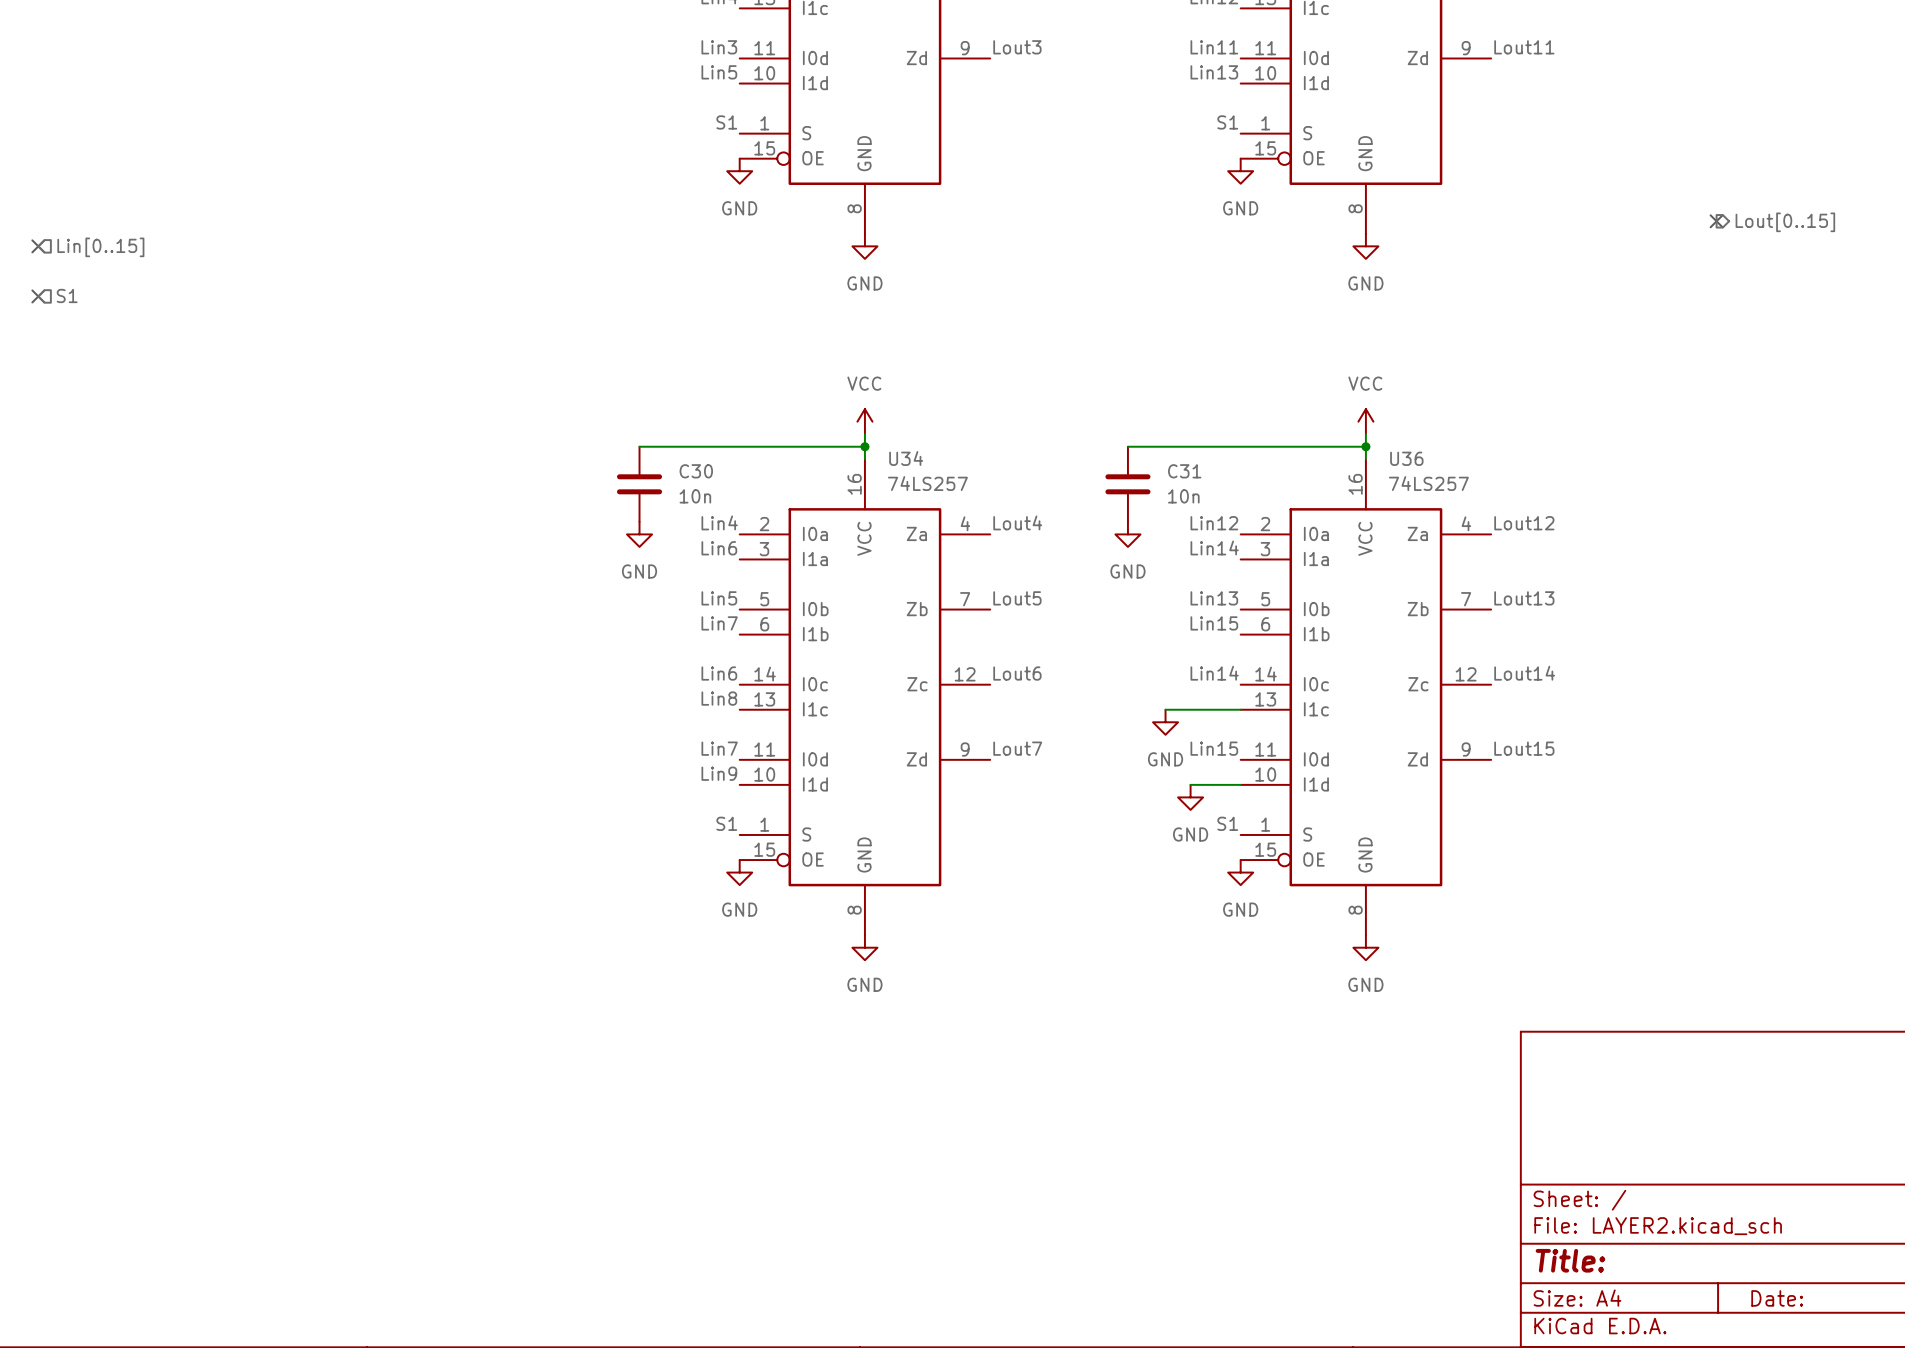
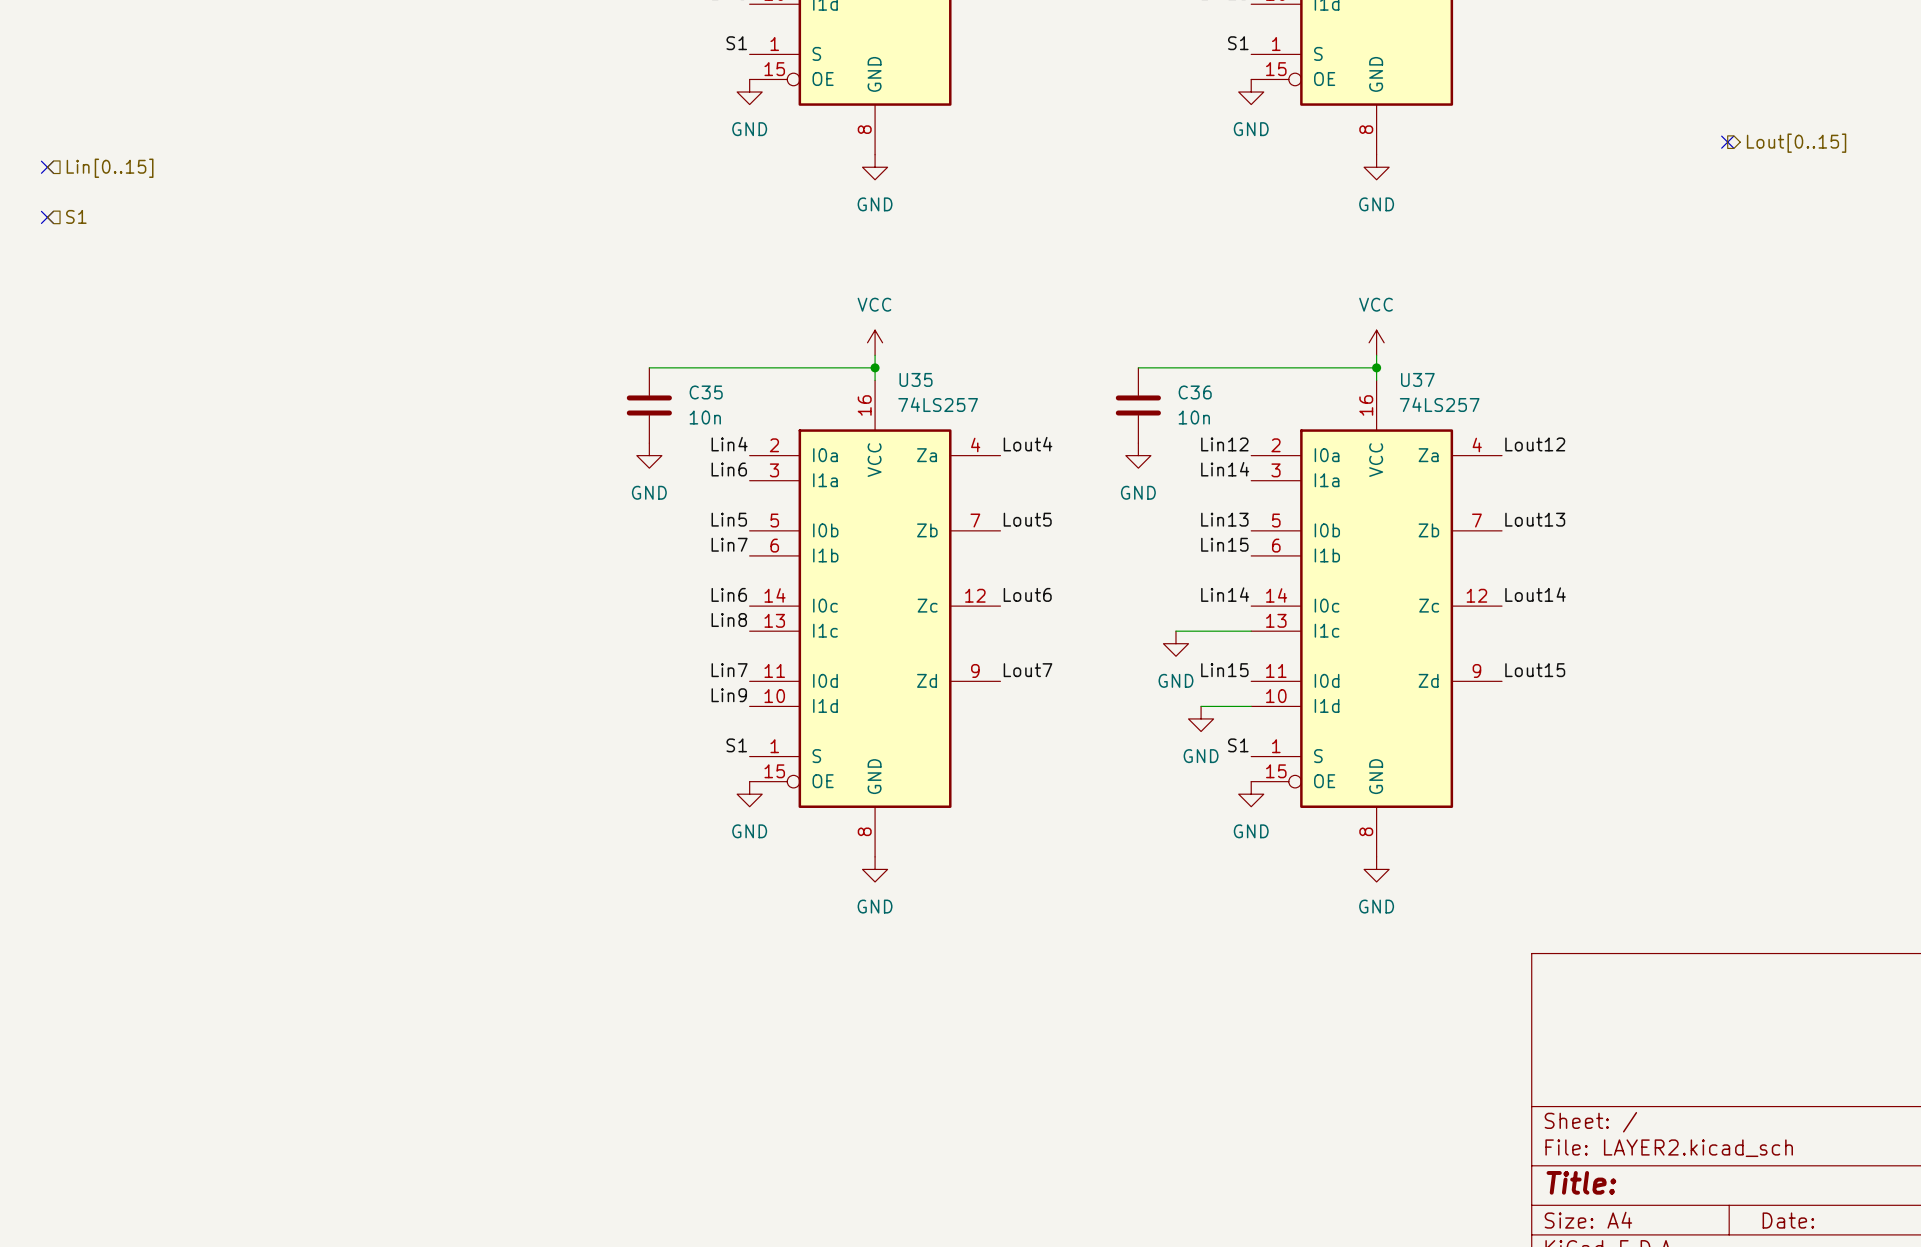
U34 name: U34 (906, 458) -> U35 (916, 379)
U36 name: U36 (1406, 458) -> U37 (1417, 379)
C30 name: C30 (696, 471) -> C35 (706, 392)
C31 name: C31 (1184, 471) -> C36 (1195, 392)

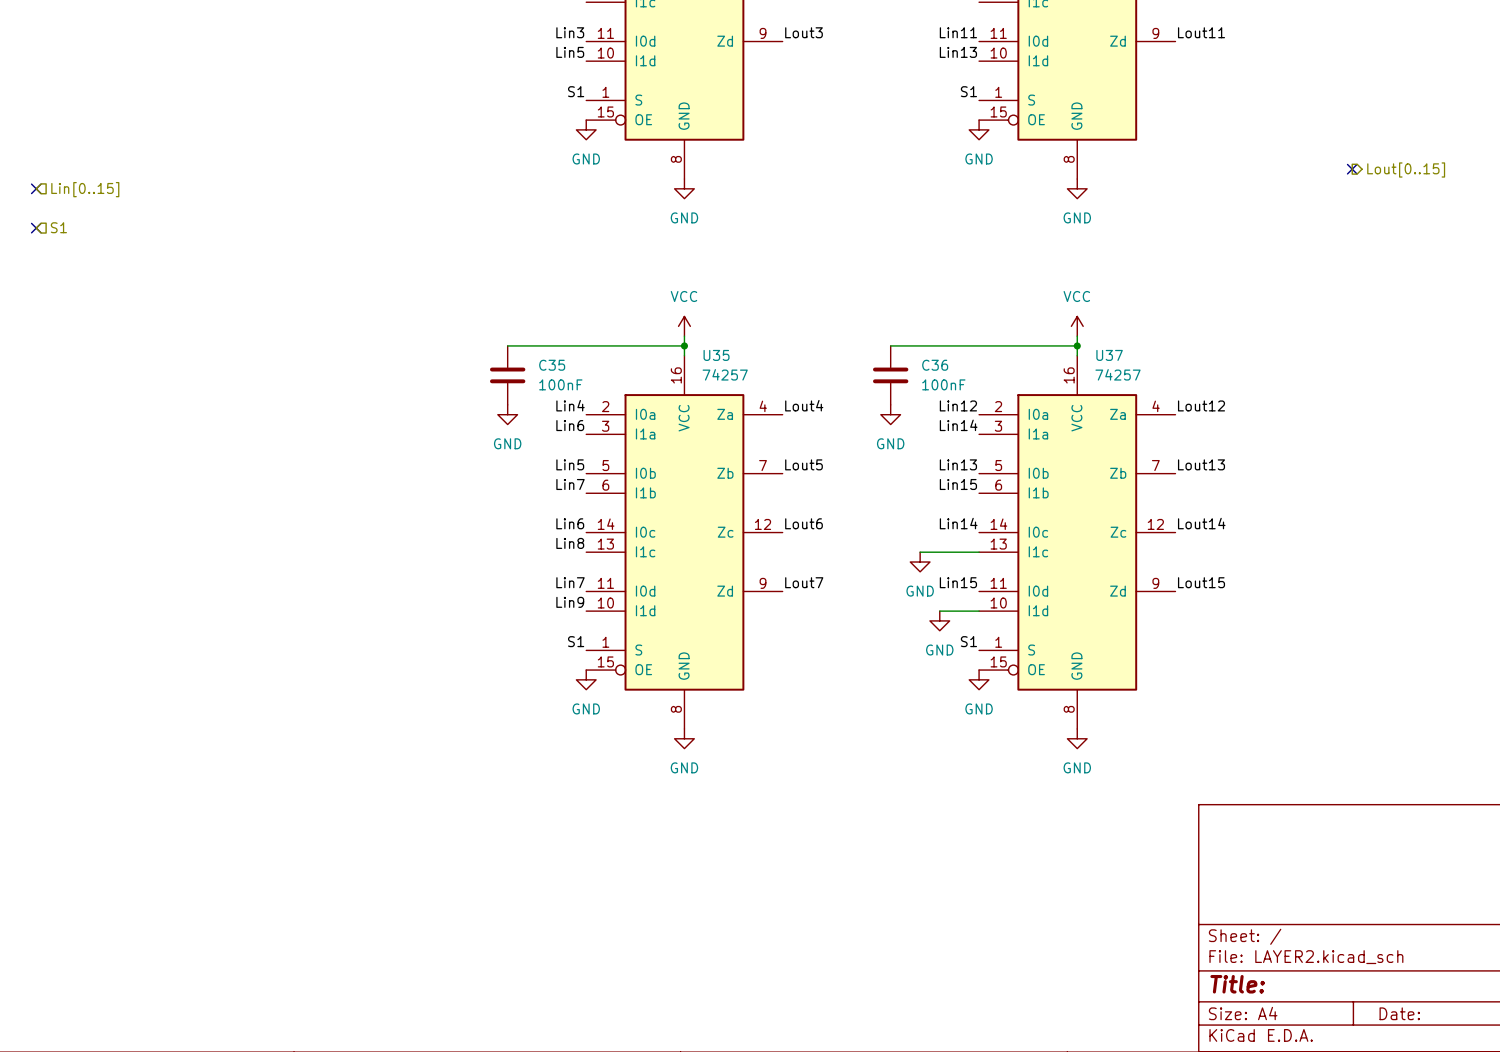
U35 value: 74LS257 (938, 404) -> 74257 (725, 374)
U37 value: 74LS257 (1439, 404) -> 74257 (1118, 374)
C35 value: 10n (705, 417) -> 100nF (560, 384)
C36 value: 10n (1194, 417) -> 100nF (943, 384)

